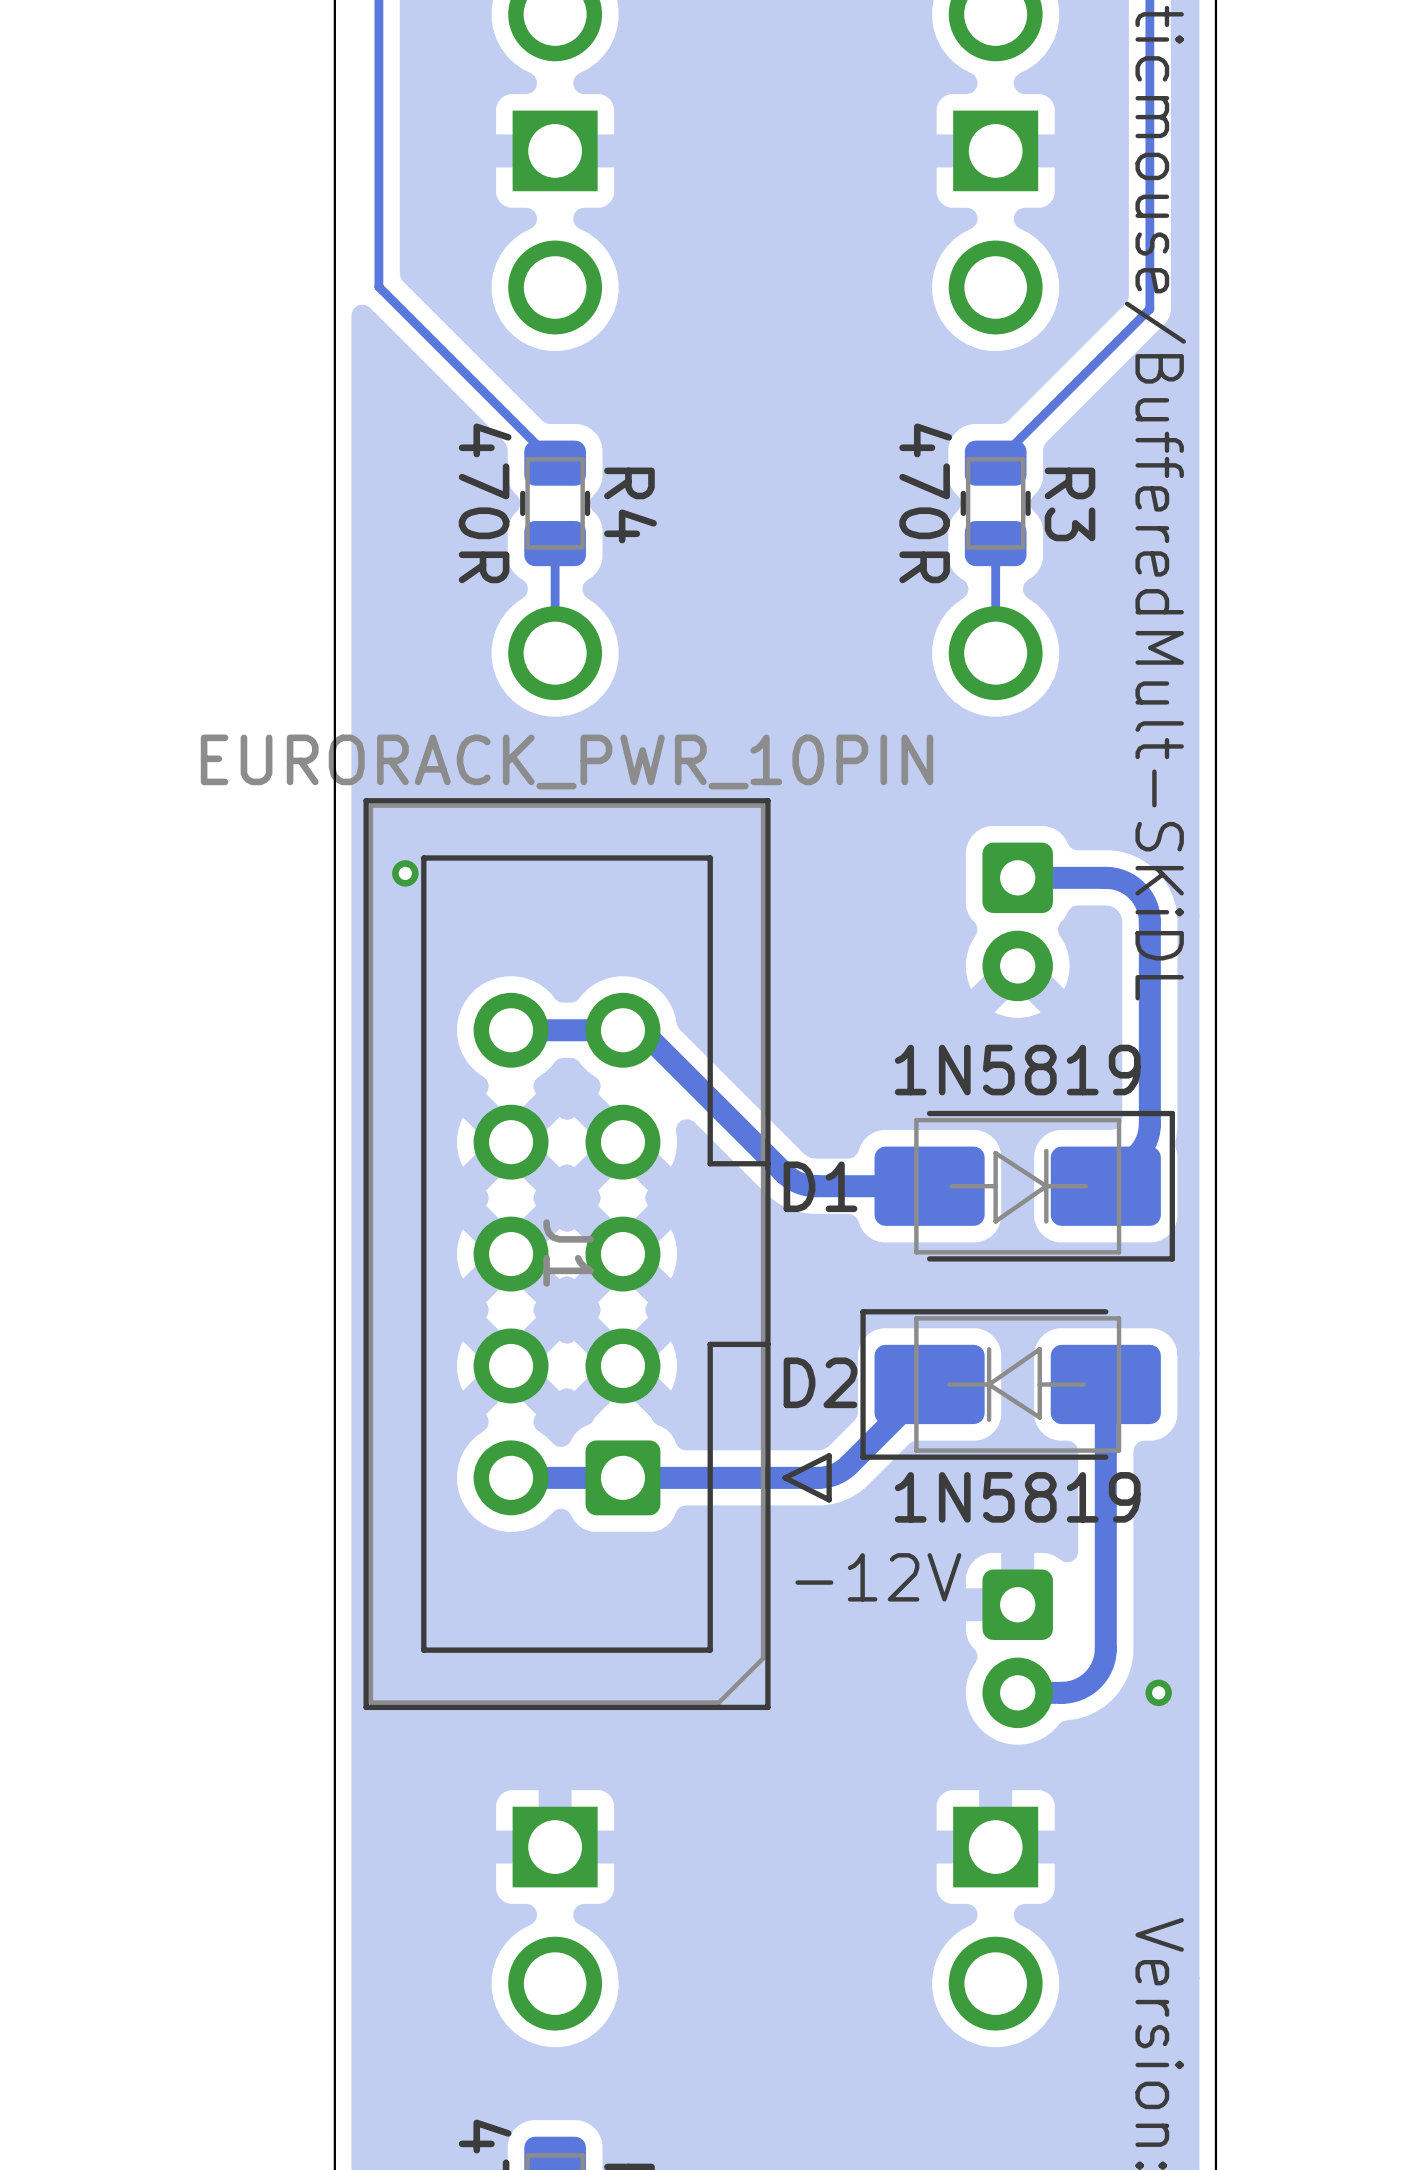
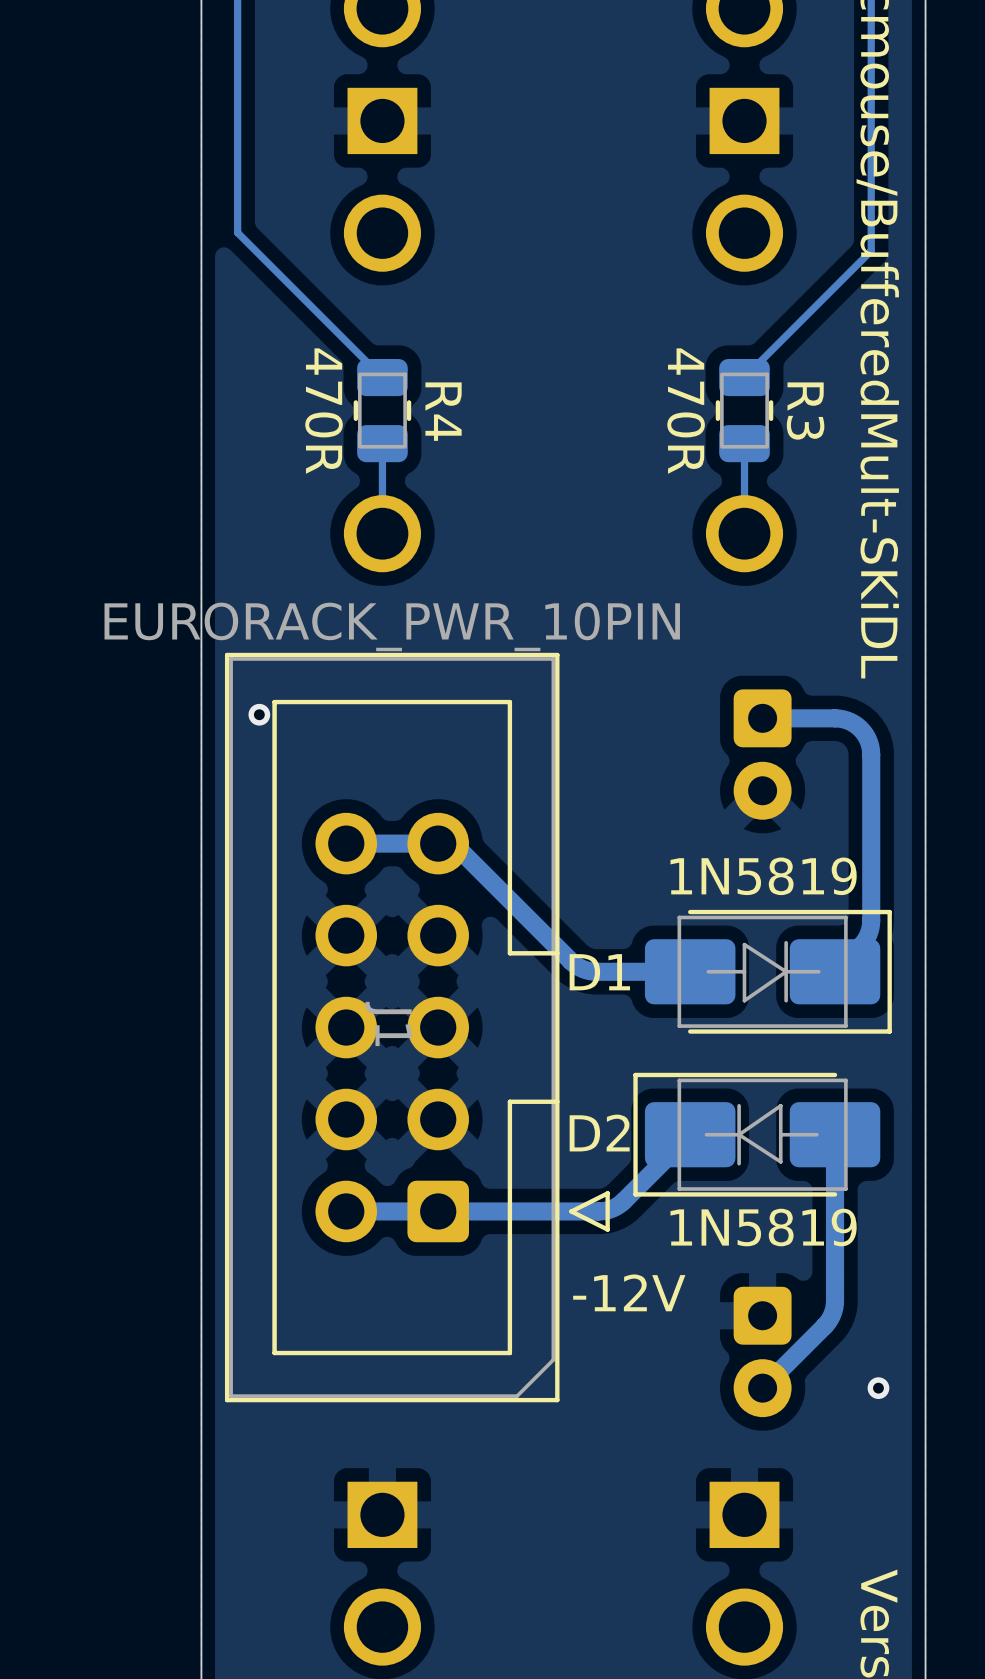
track: (1105, 1586) (1105, 1653) (1103, 1663) (1096, 1676) (1085, 1686) (1071, 1691) (1017, 1692) -> (835, 1300) (832, 1314) (826, 1323) (762, 1388)

